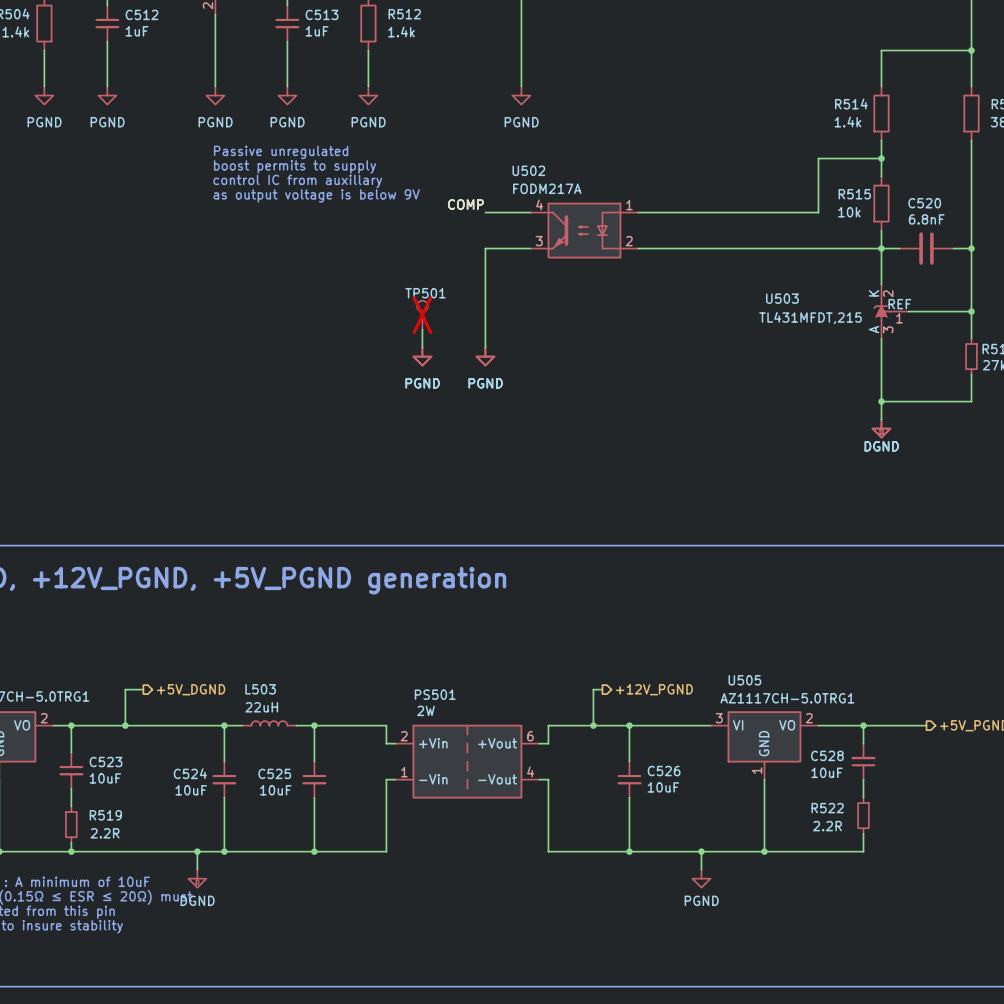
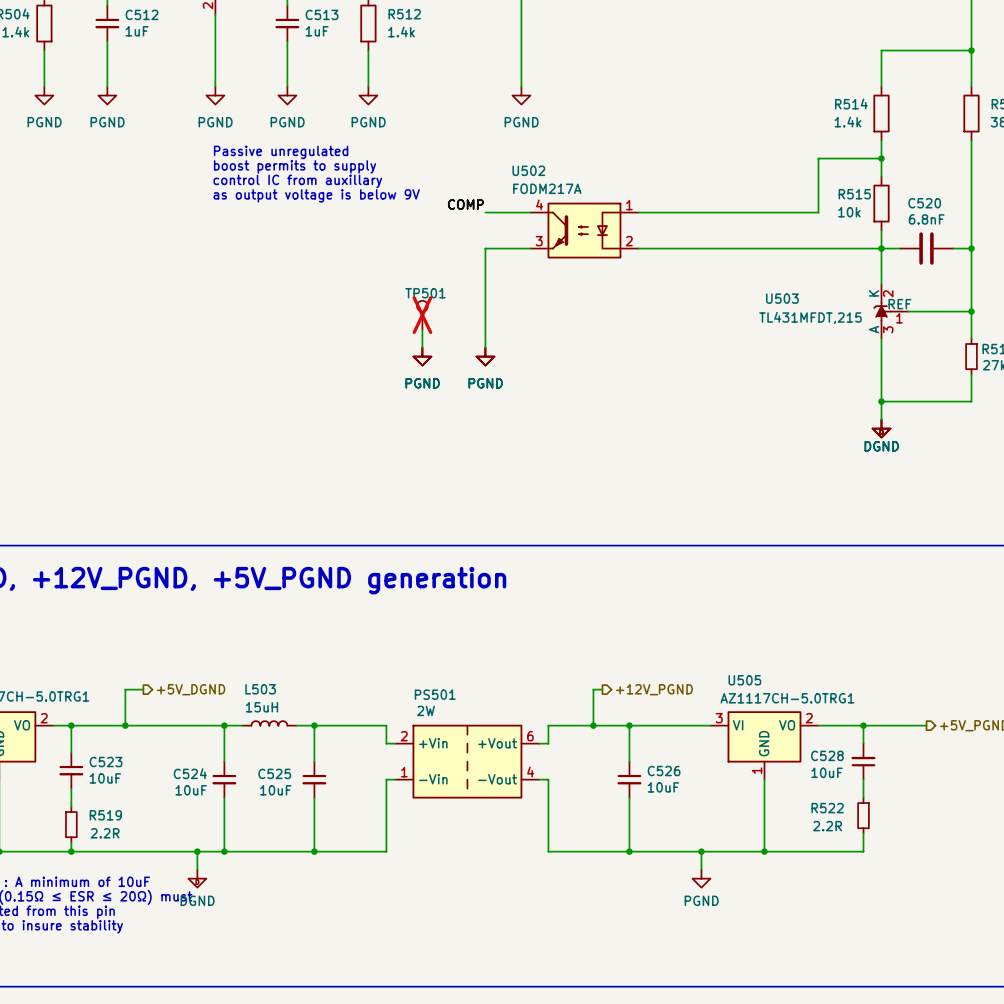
L503 value: 22uH (261, 707) -> 15uH (261, 707)

